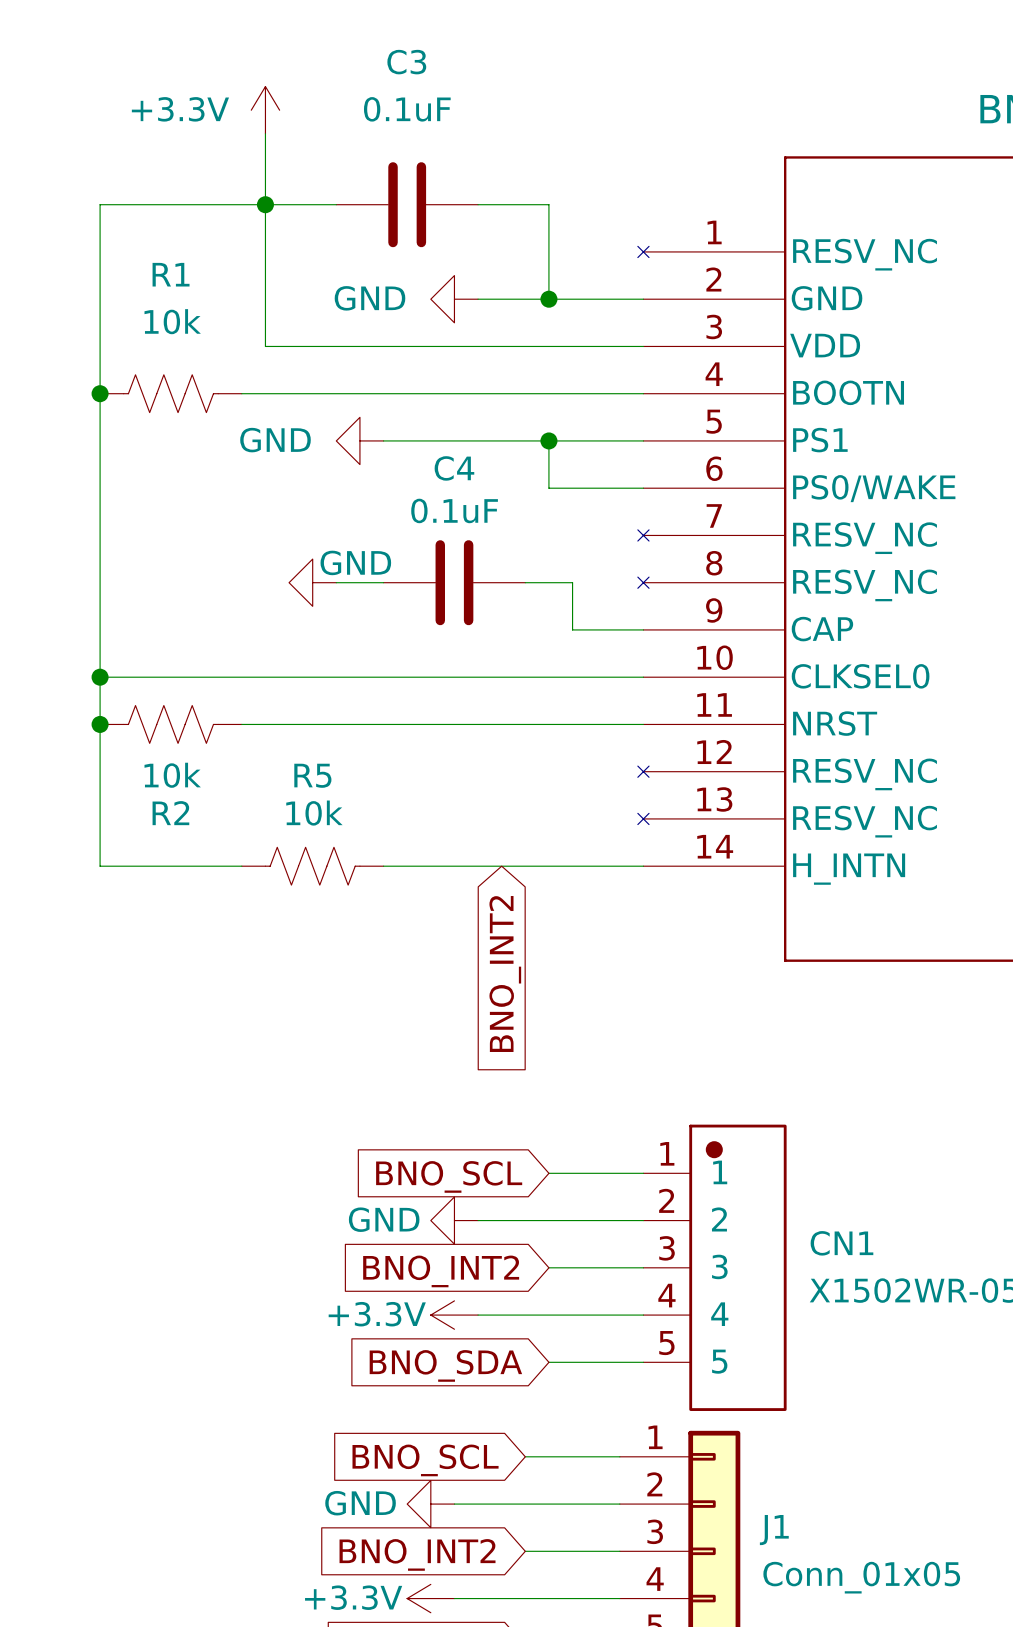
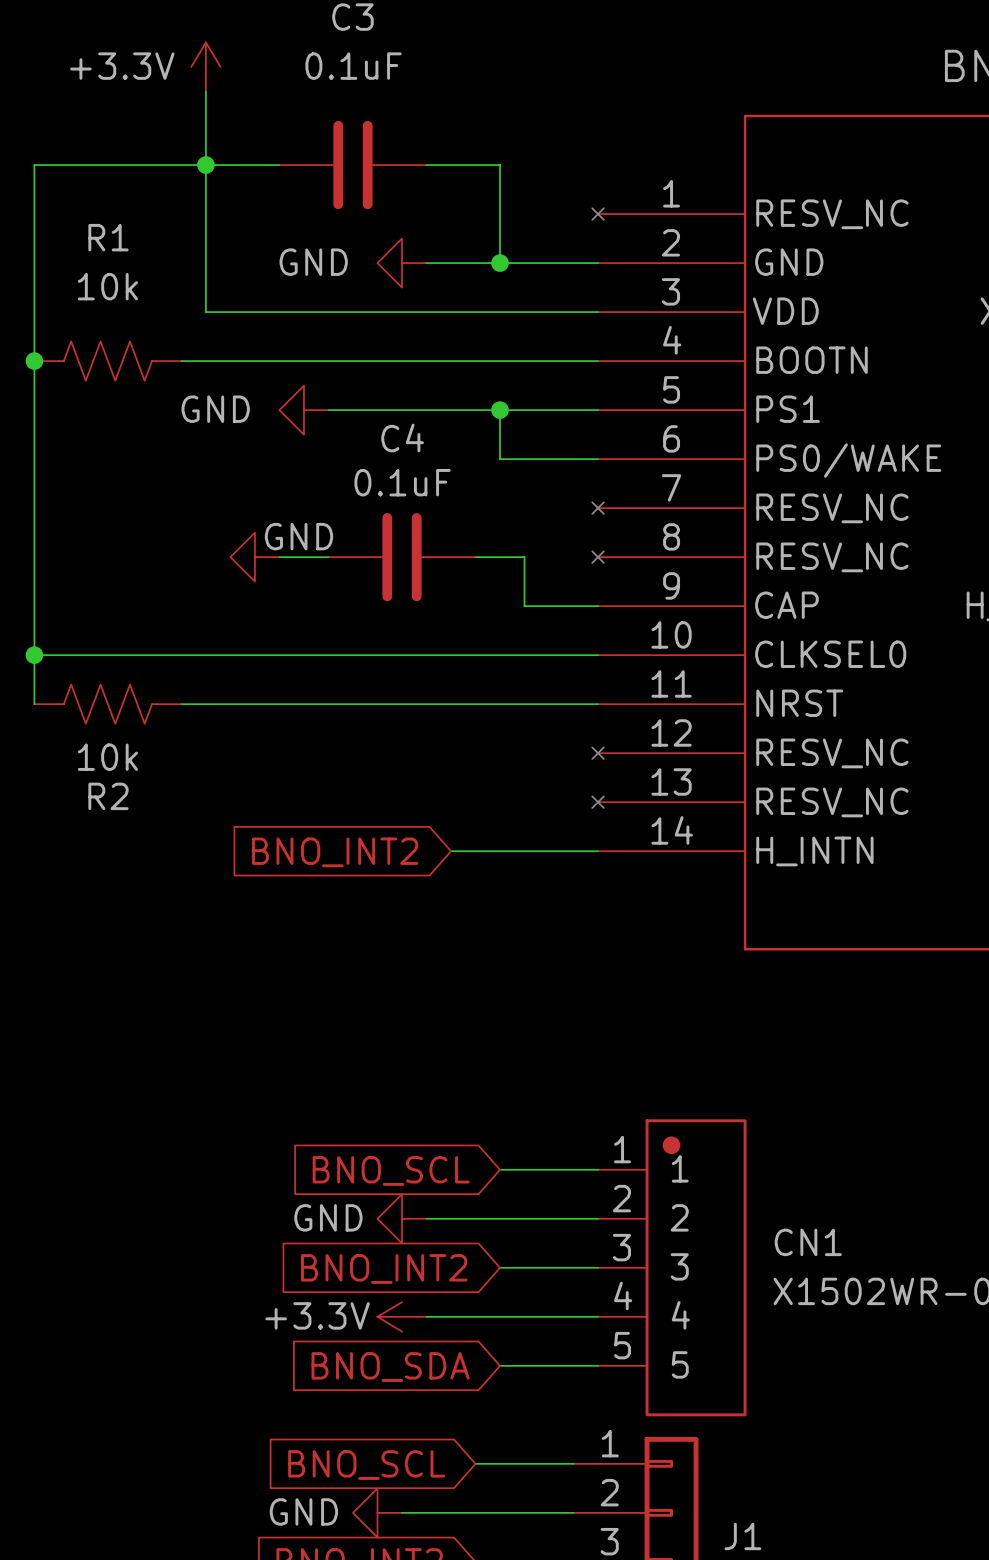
wire: (100, 724) (100, 866) (241, 866) -> none
junction: (100, 724) -> none
R5: 10k (312, 866) -> none
wire: (383, 866) (501, 866) -> none
global label rotation: 0° (505, 974) -> 90° clockwise (335, 852)

